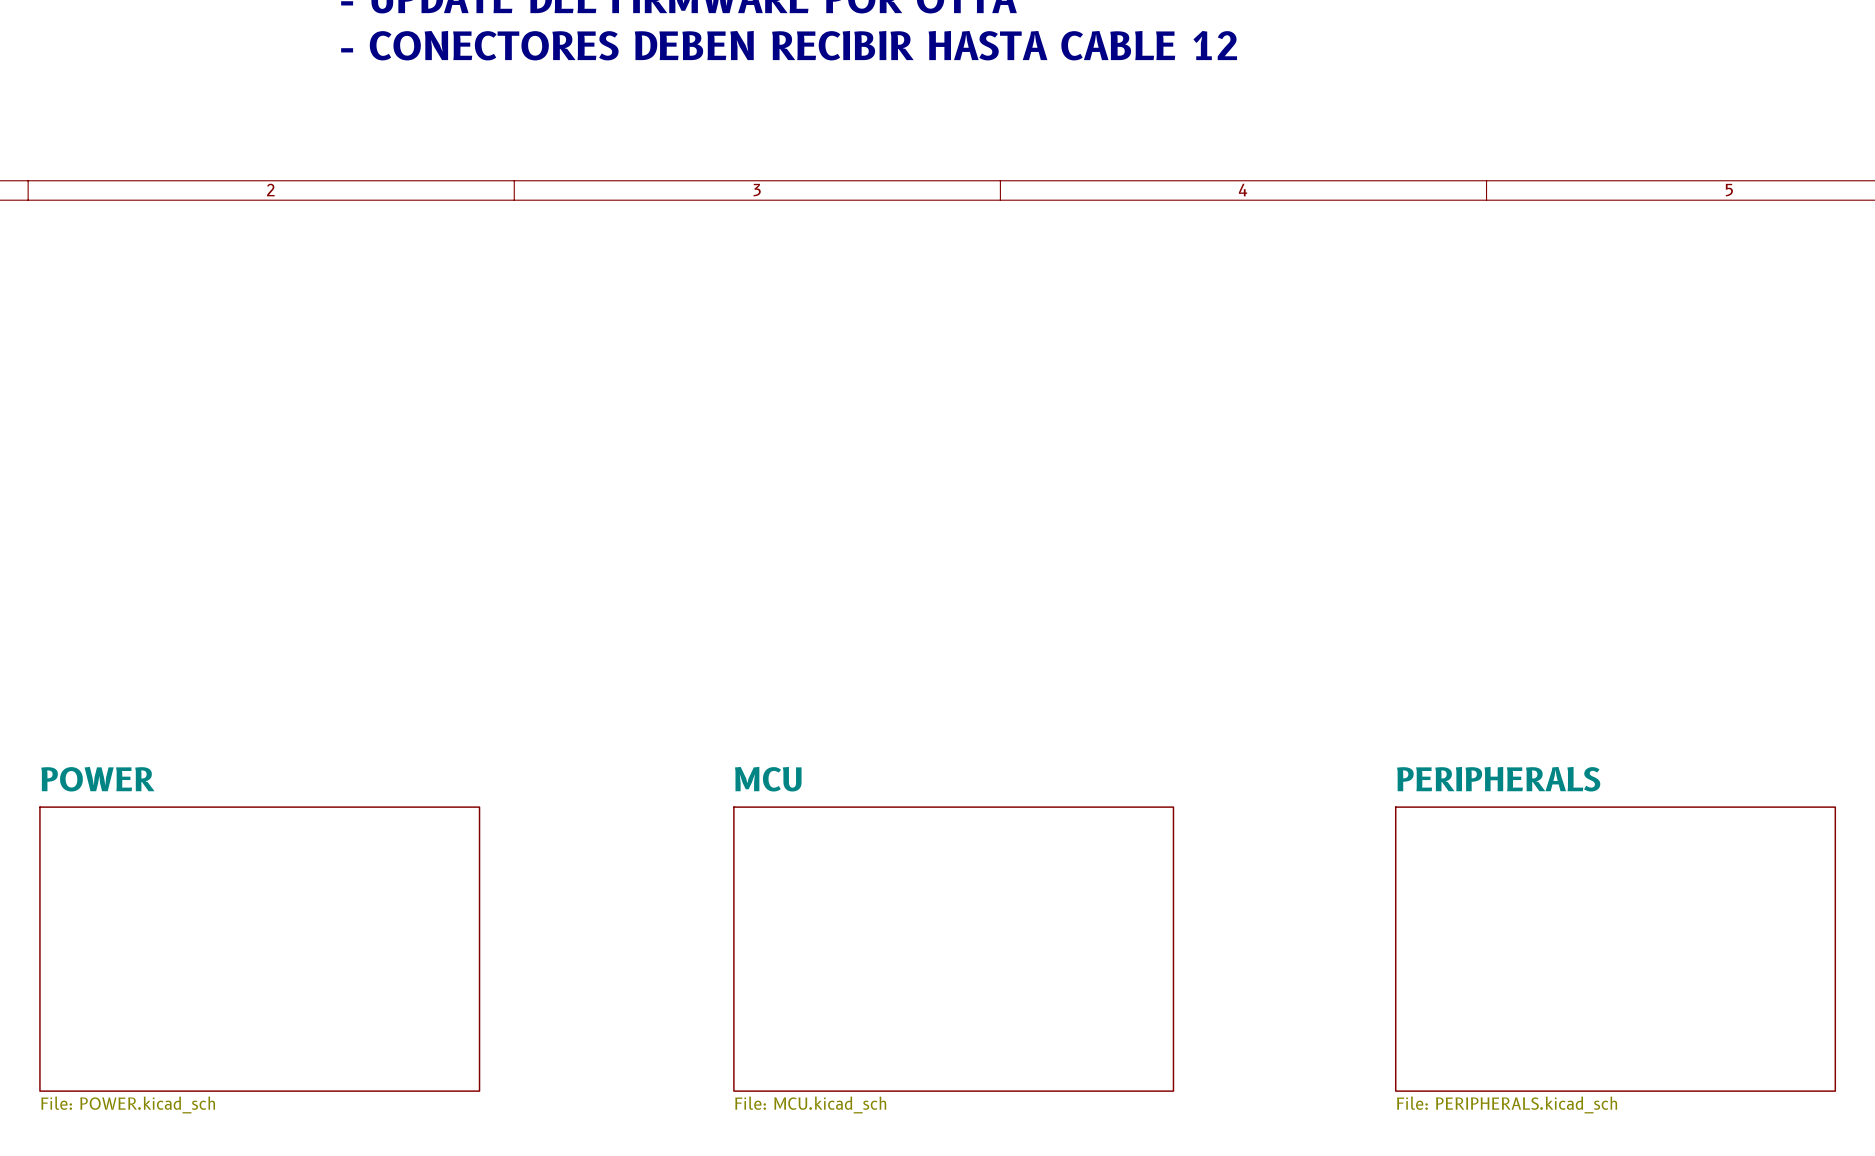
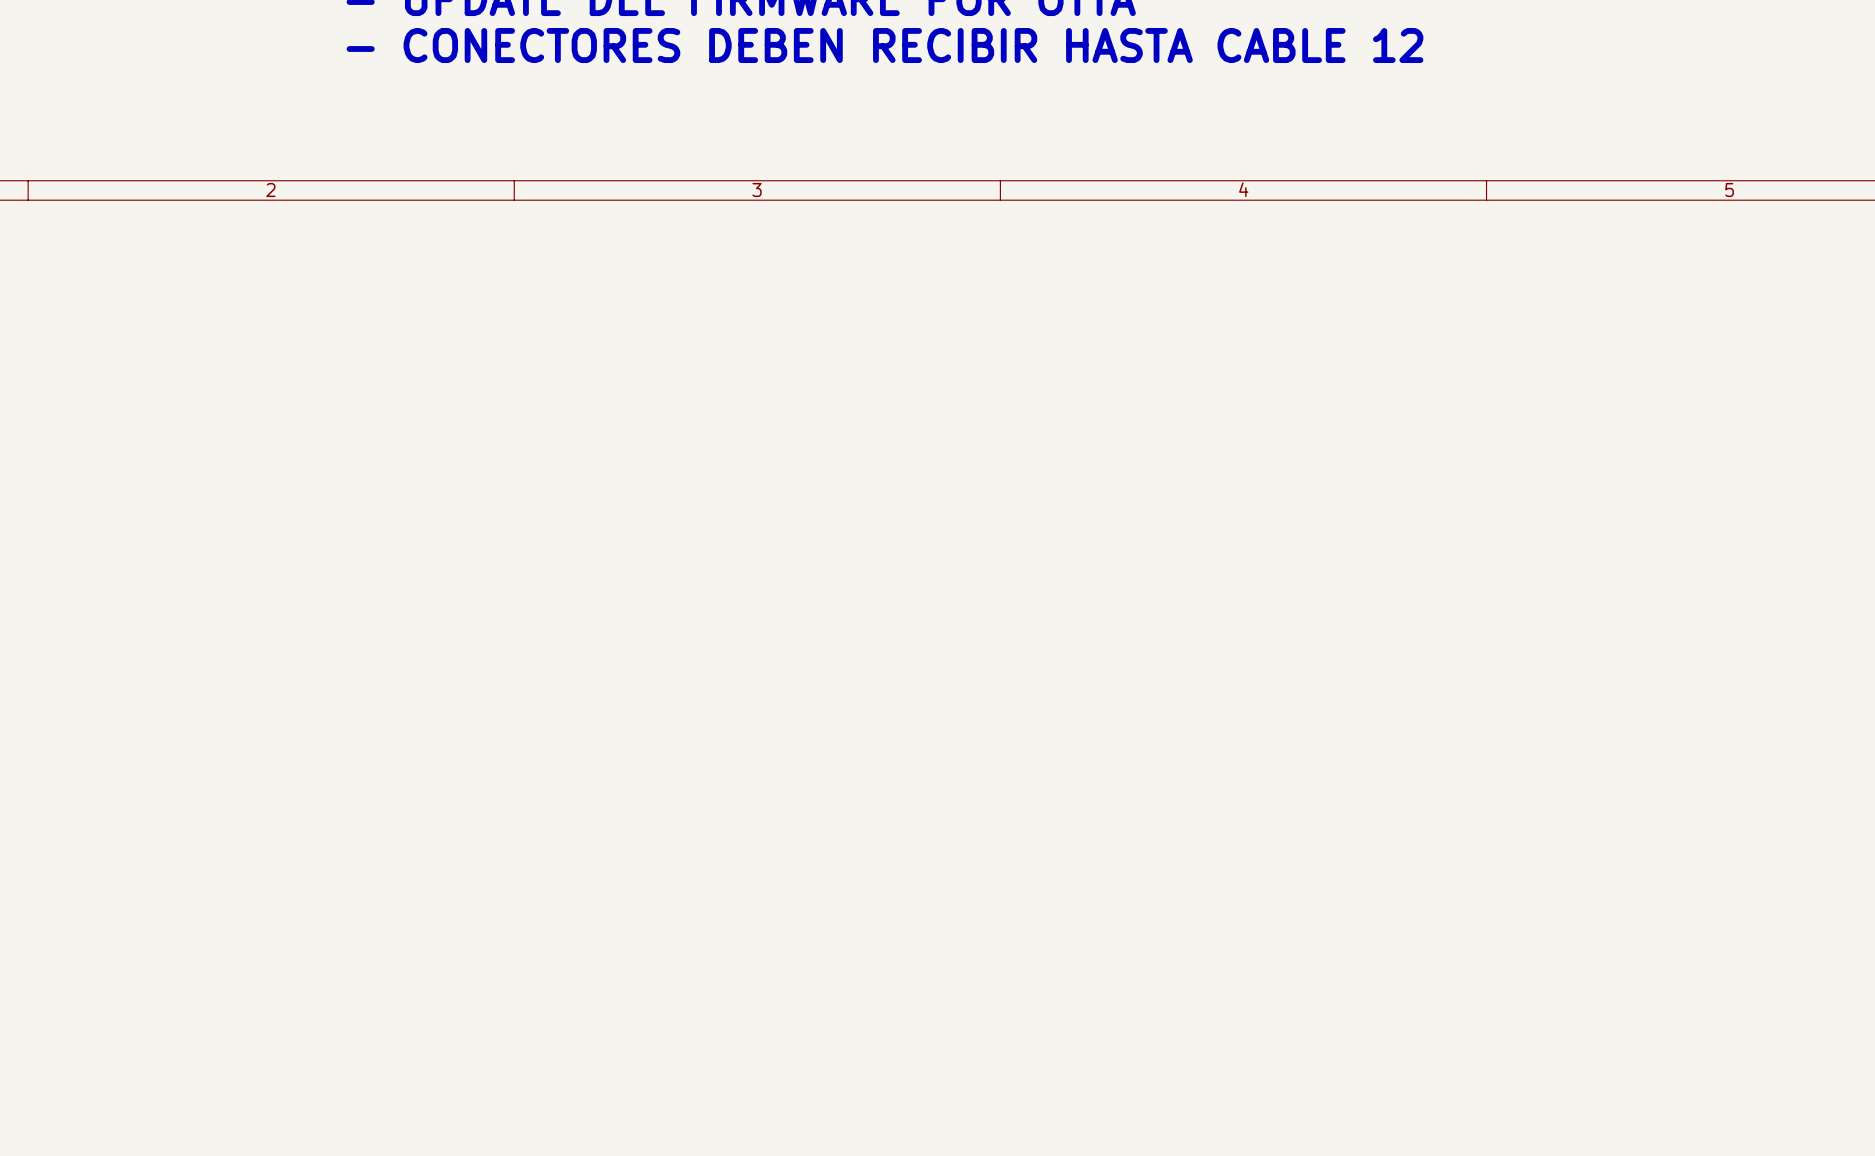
sheet POWER: File: POWER.kicad_sch (259, 949) -> none
sheet MCU: File: MCU.kicad_sch (953, 949) -> none
sheet PERIPHERALS: File: PERIPHERALS.kicad_sch (1615, 949) -> none

